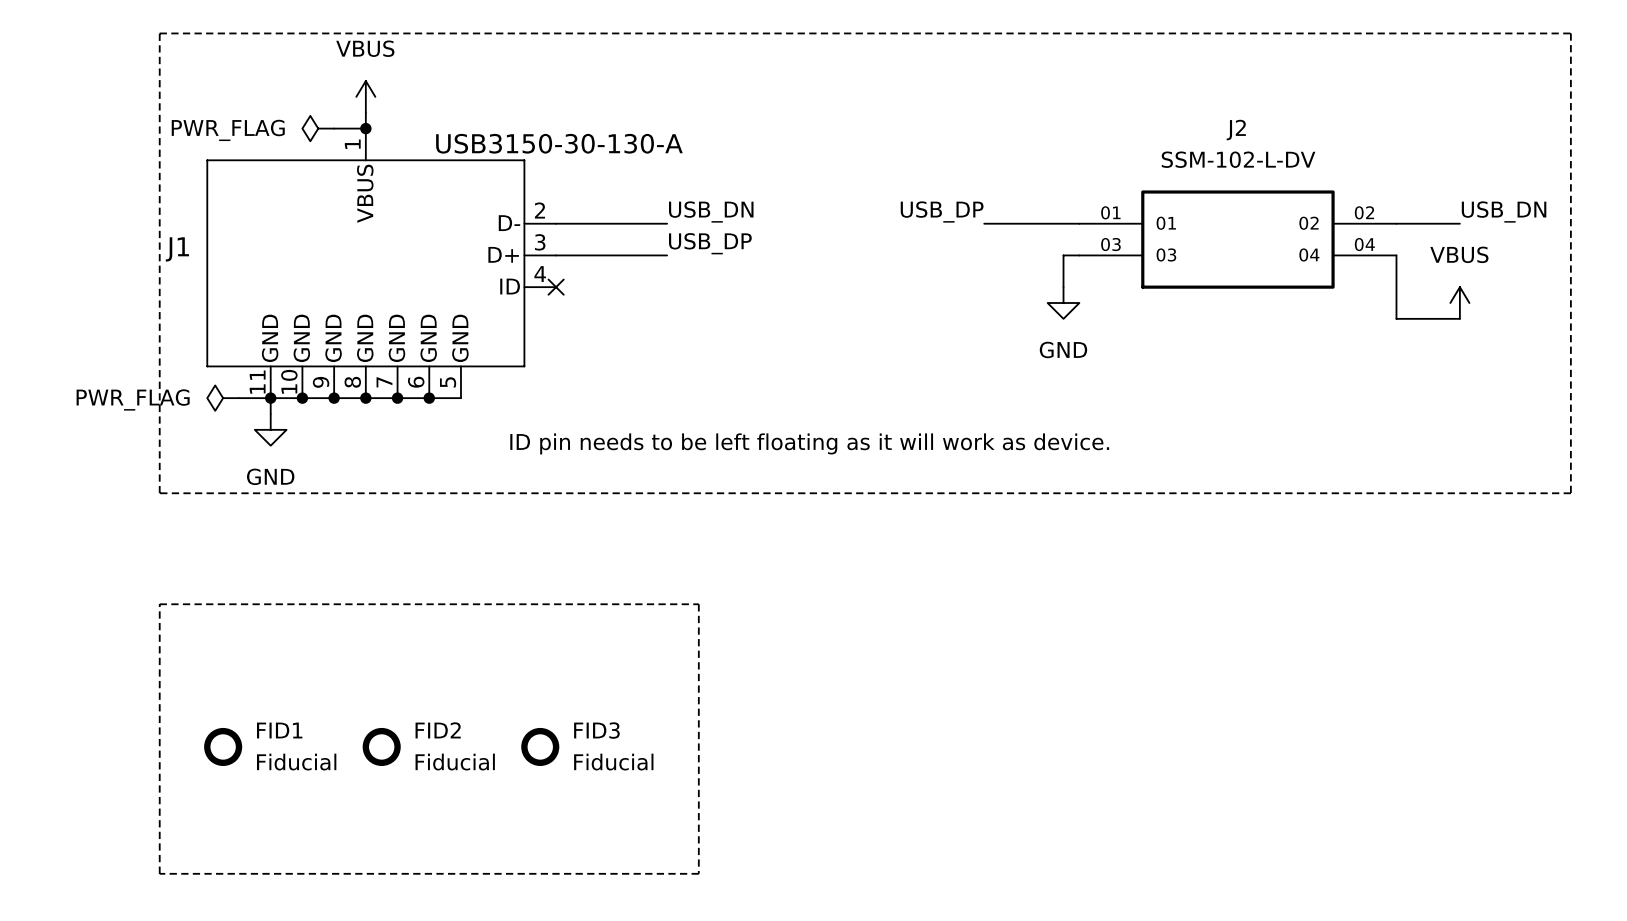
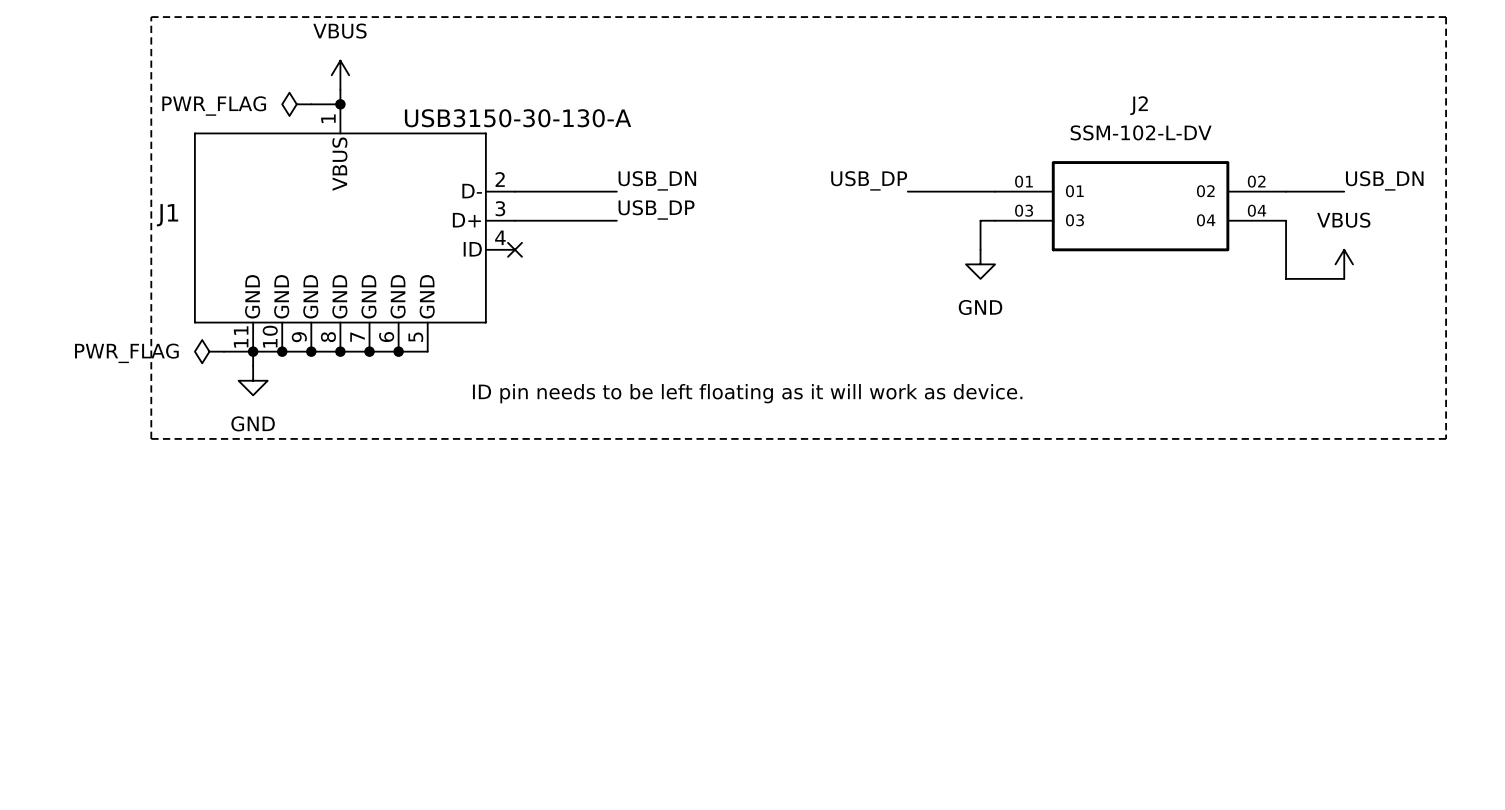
line: (159, 604) (698, 604) (698, 873) (159, 873) (159, 604) -> none
FID1: Fiducial (223, 746) -> none
FID2: Fiducial (381, 746) -> none
FID3: Fiducial (540, 746) -> none

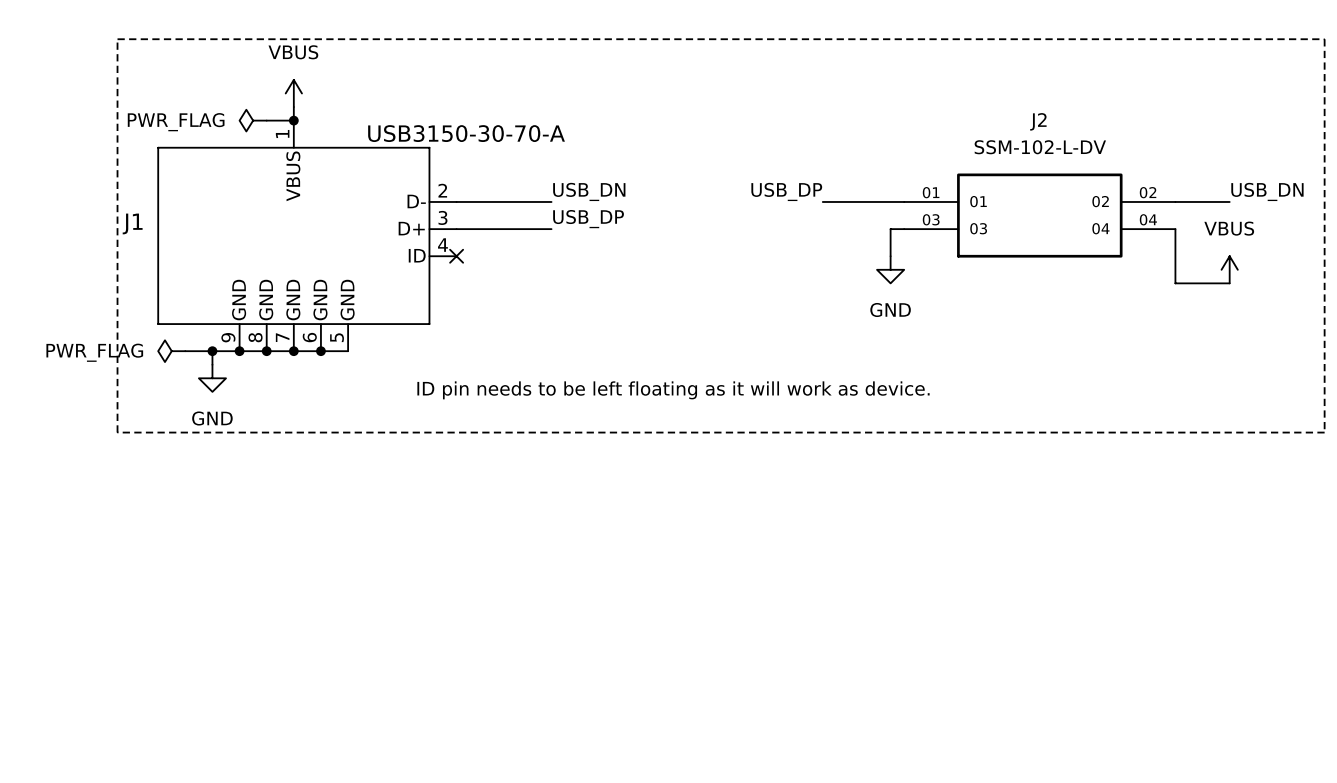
J1 symbol: [194, 104, 516, 352] -> [157, 120, 457, 352]
J1 value: USB3150-30-130-A (518, 118) -> USB3150-30-70-A (466, 133)
wire: (398, 351) (427, 351) -> none
junction: (398, 351) -> none

